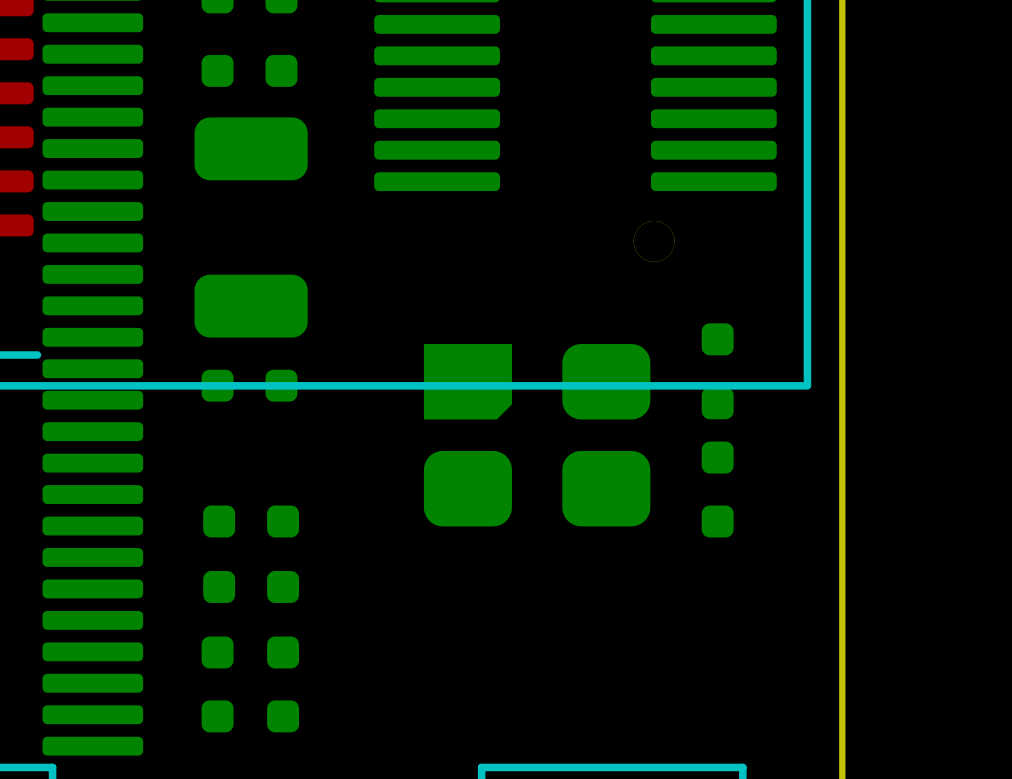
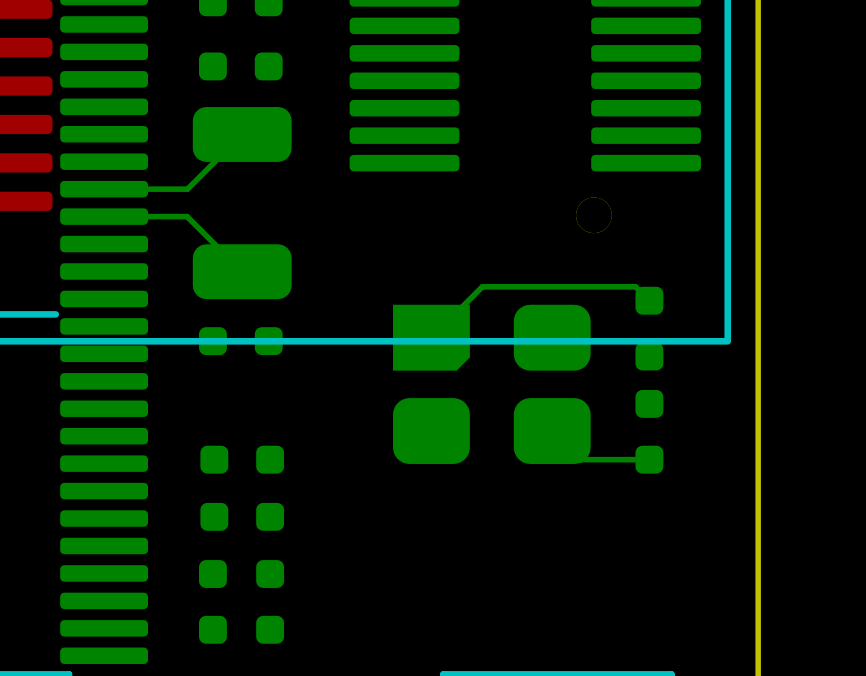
bottom track: none -> (242, 134) (187, 189) (104, 189)
bottom track: none -> (104, 216) (187, 216) (242, 271)
bottom track: none -> (649, 300) (635, 286) (482, 286) (431, 337)
bottom track: none -> (552, 431) (580, 459) (649, 459)

